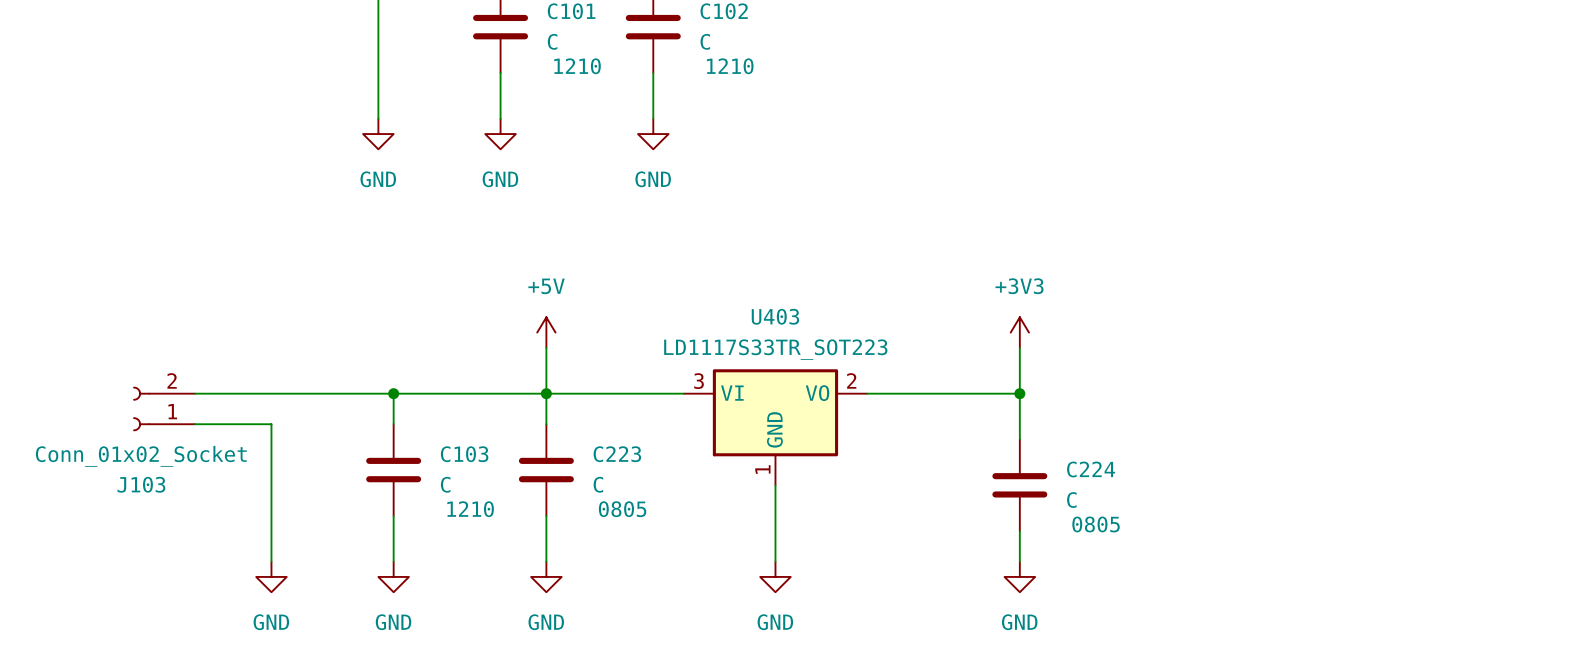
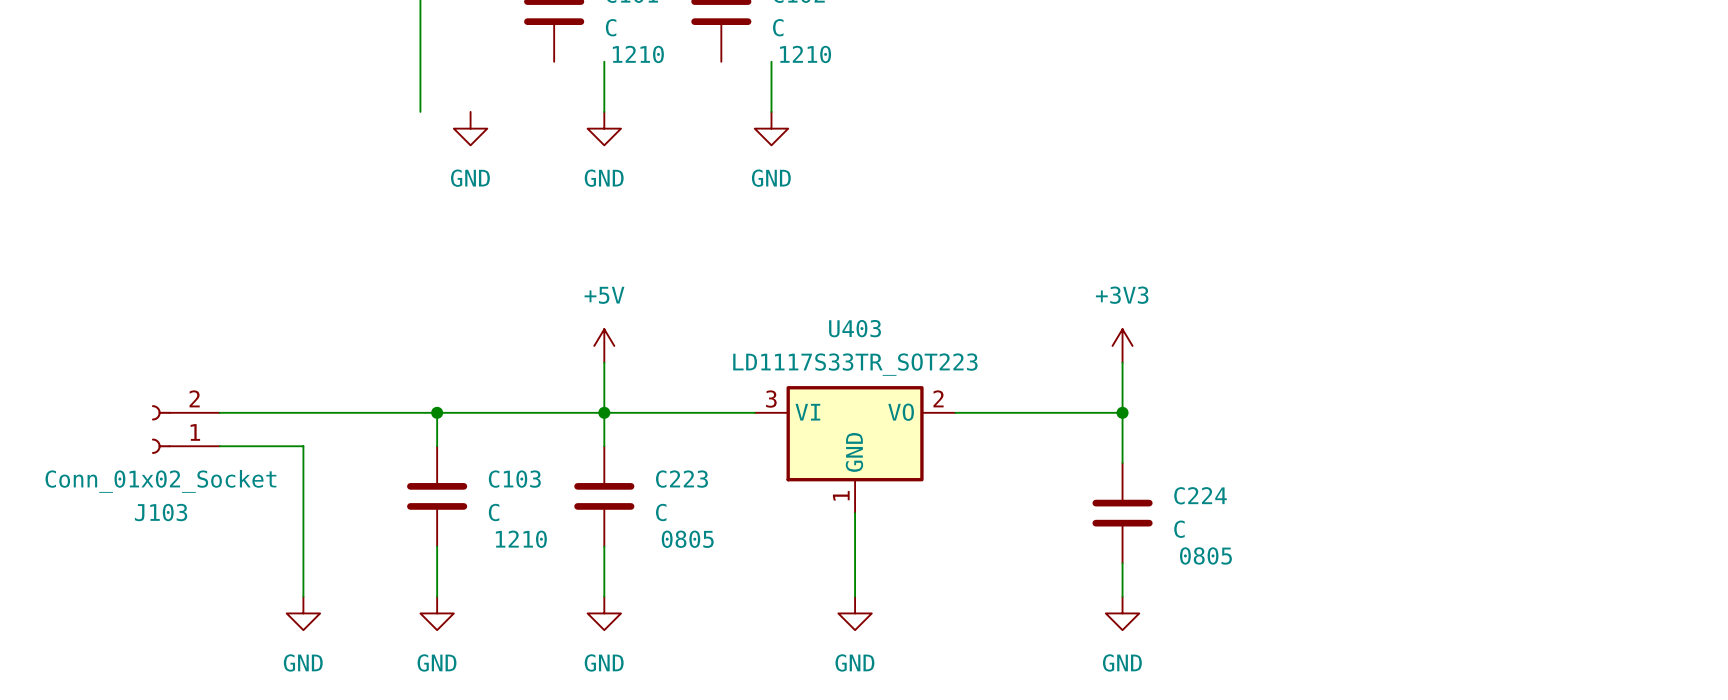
wire: (500, 72) (500, 118) -> (604, 61) (604, 111)
wire: (653, 72) (653, 118) -> (771, 61) (771, 111)
power symbol: GND (378, 134) -> none
power symbol: none -> GND (470, 128)
power symbol: GND (500, 134) -> none
power symbol: none -> GND (604, 128)
power symbol position: GND (653, 134) -> GND (771, 128)

